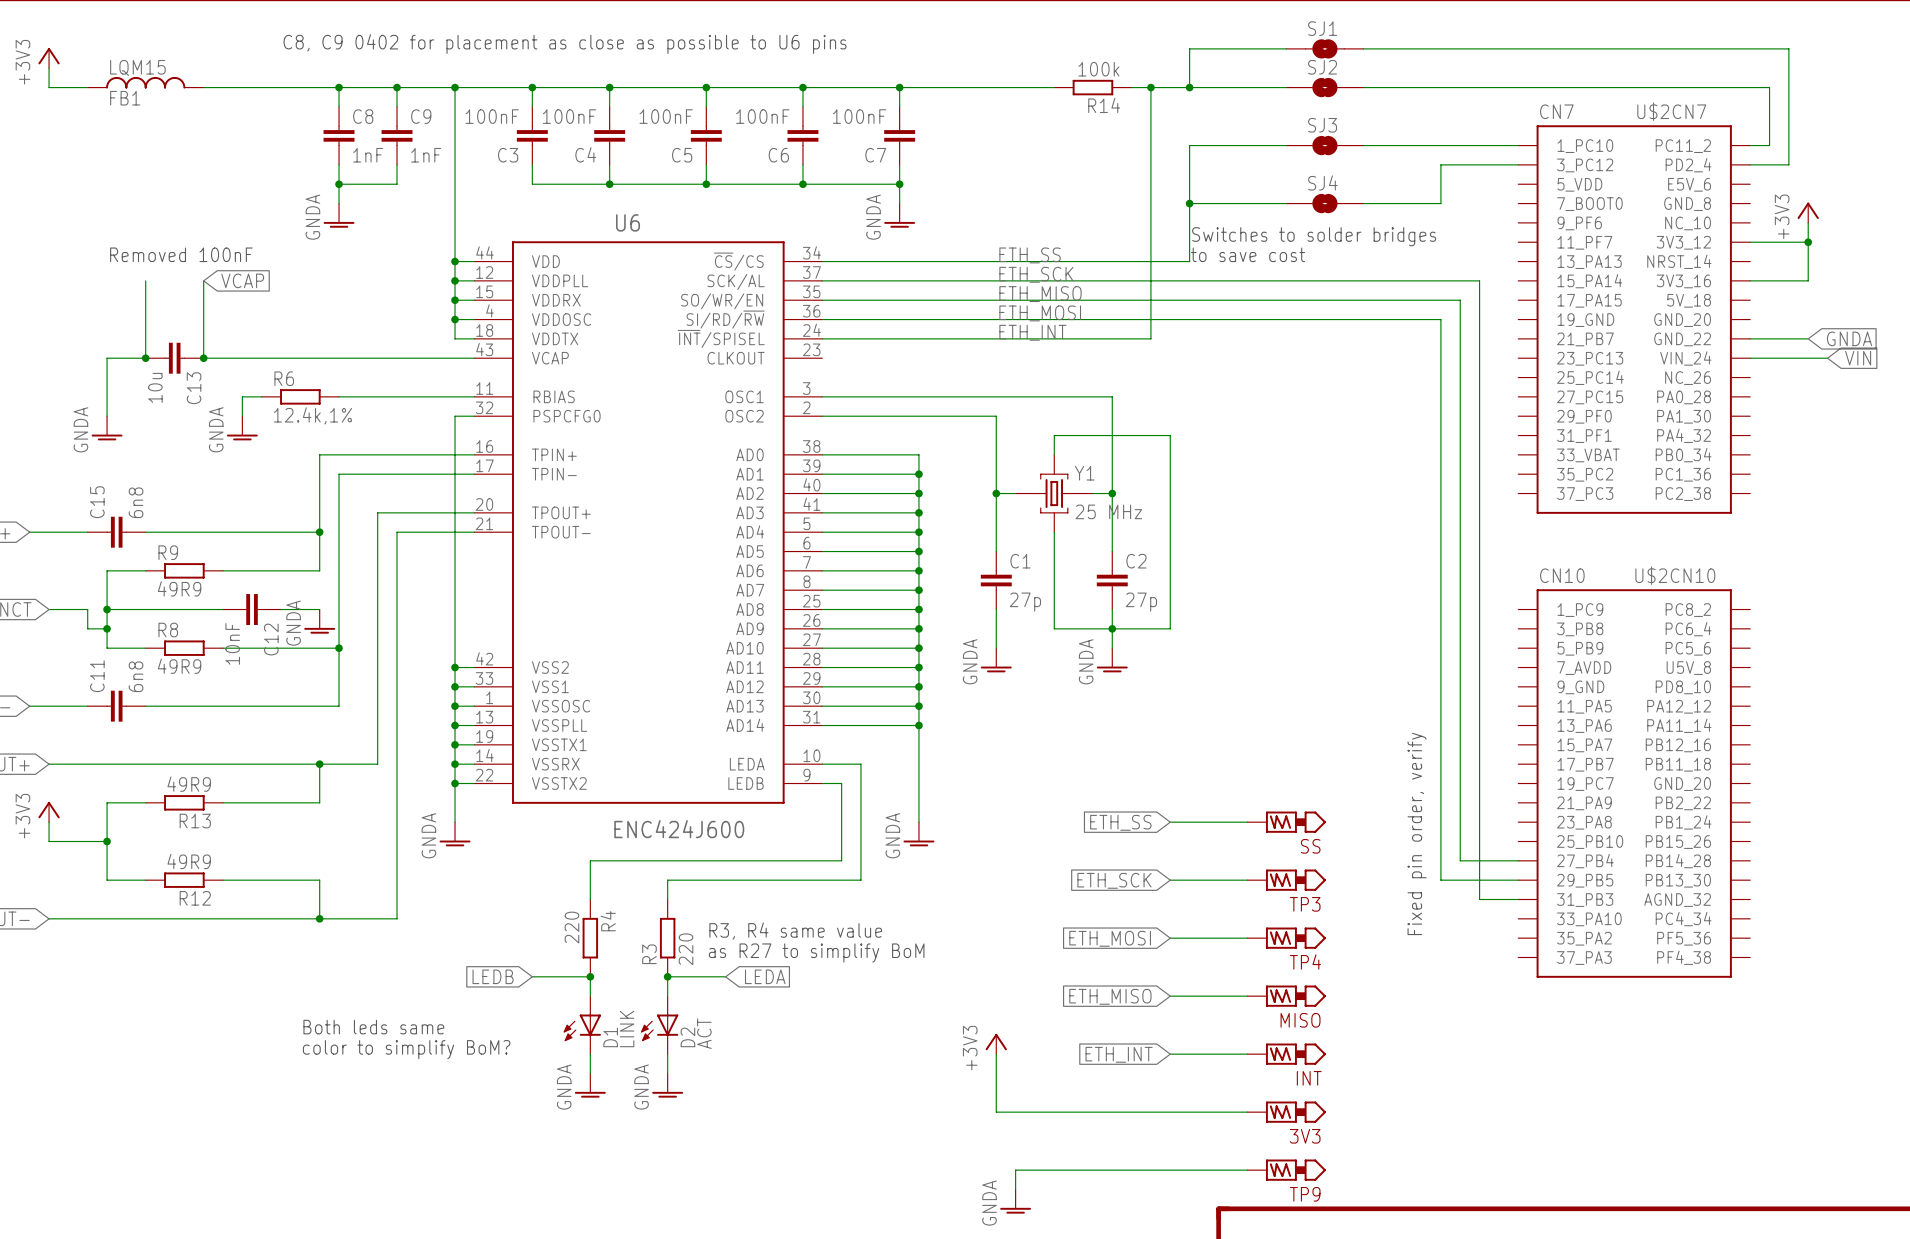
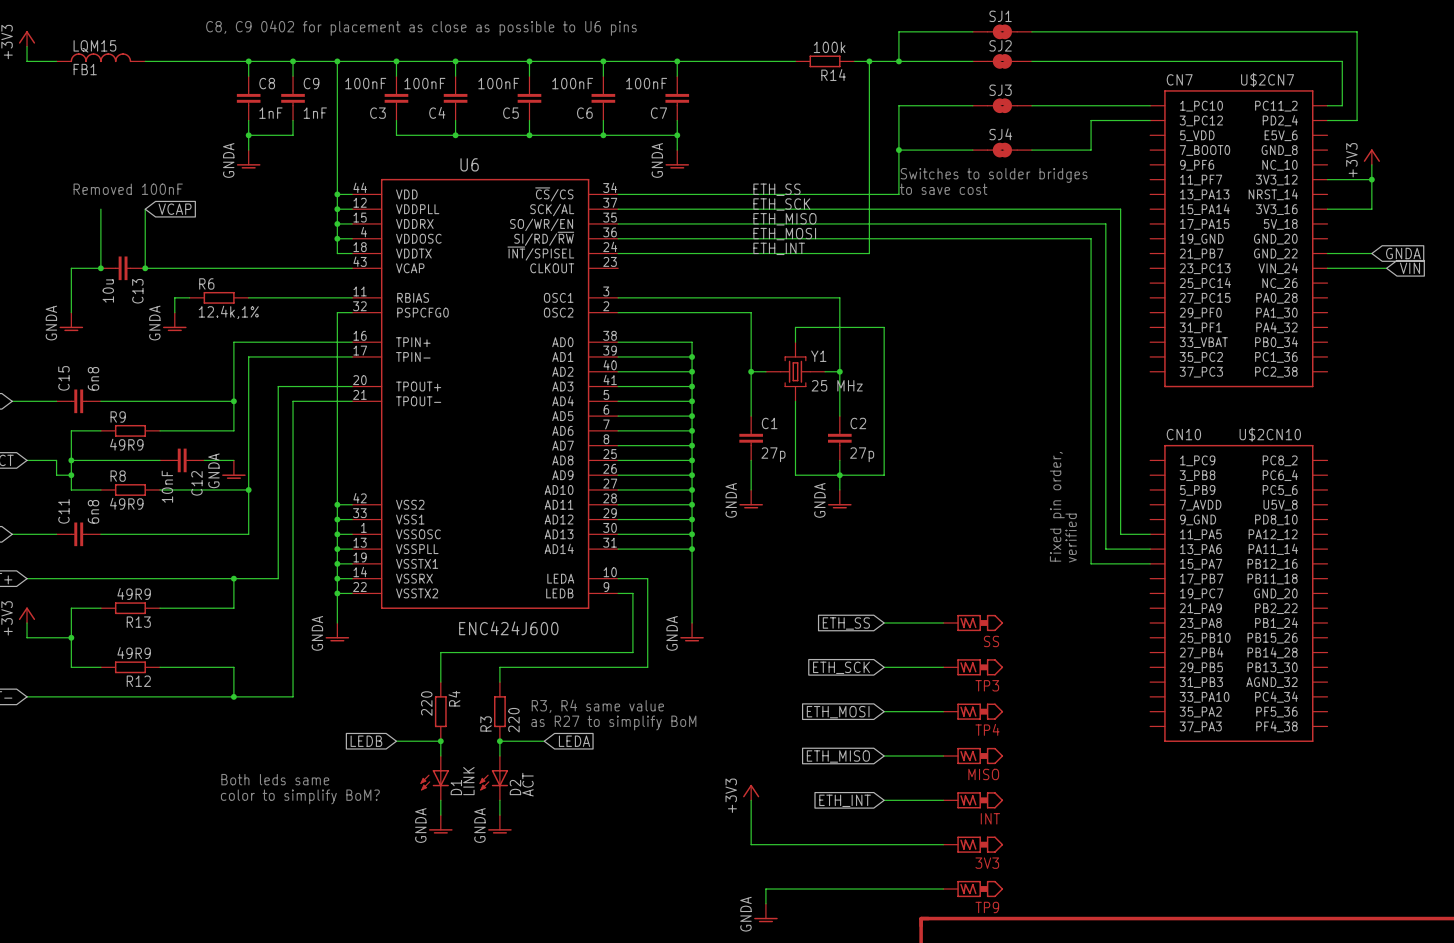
text: none -> Fixed pin order, (1057, 506)
wire: (1479, 706) (1479, 899) (1518, 899) -> (1120, 534) (1150, 534)
text: none -> verified (1071, 538)
wire: (1460, 725) (1460, 860) (1518, 860) -> (1105, 549) (1150, 549)
wire: (1440, 744) (1440, 880) (1518, 880) -> (1091, 563) (1150, 563)
text: Fixed pin order, verify (1417, 833) -> none

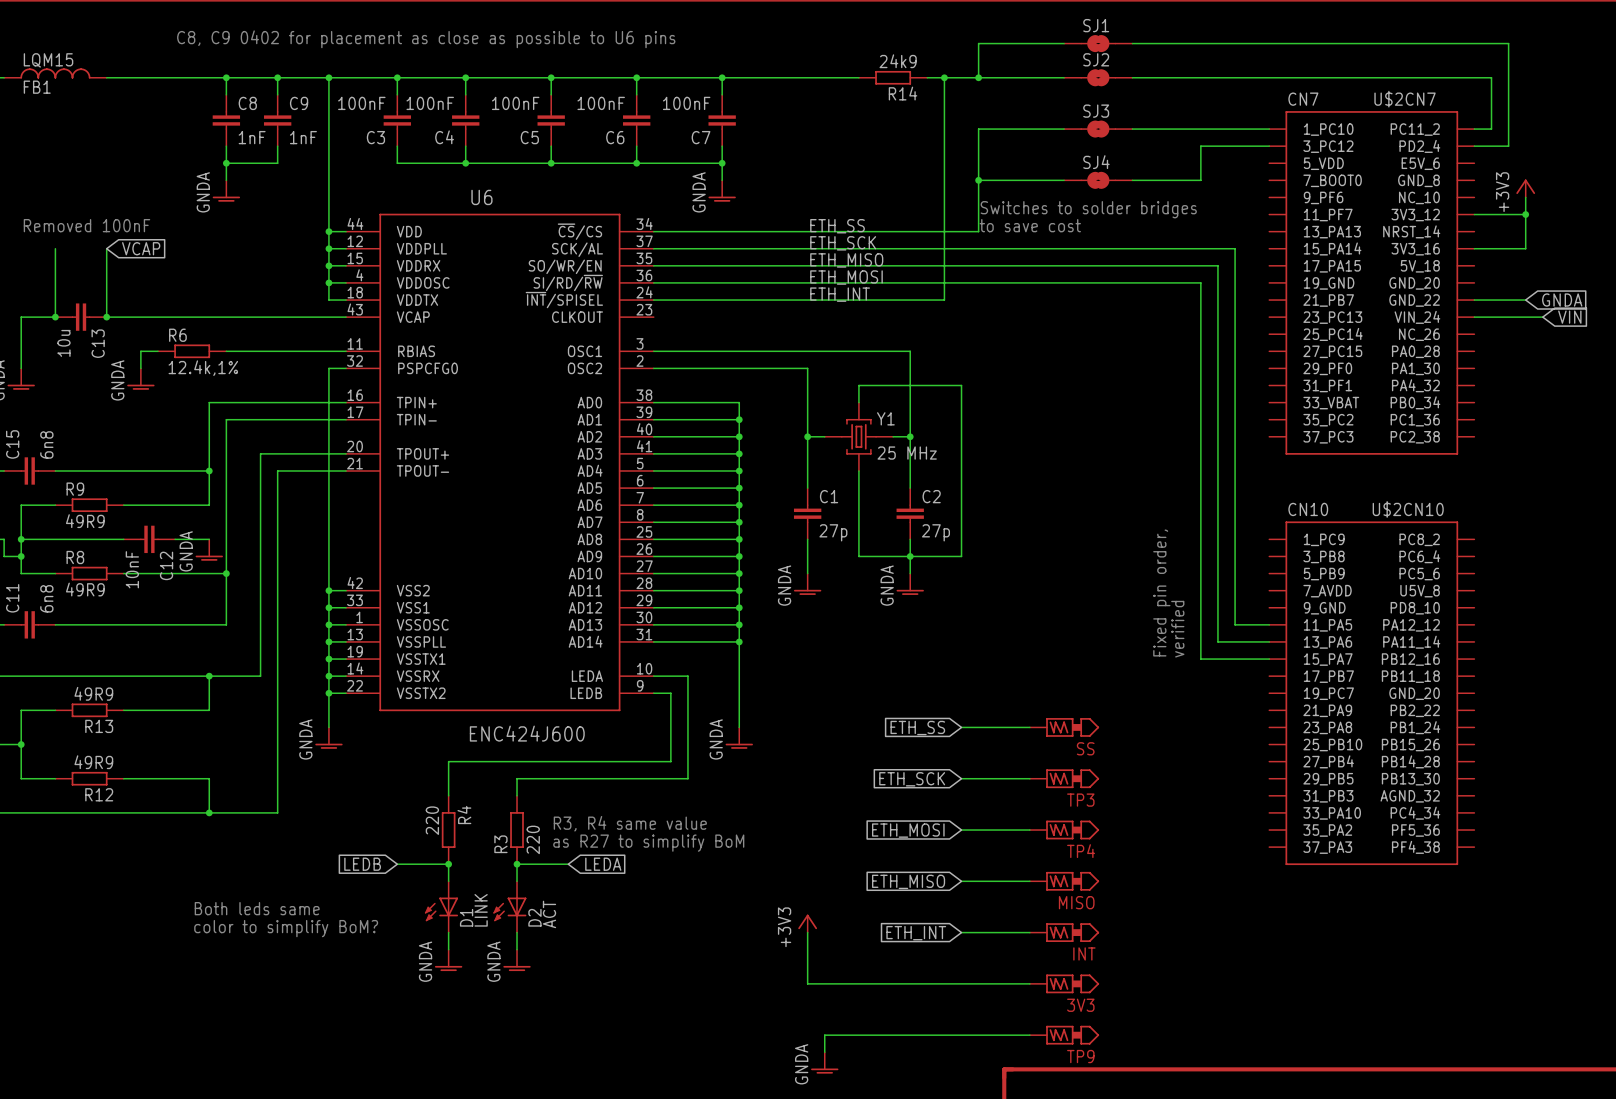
R14 value: 100k (829, 47) -> 24k9 (898, 61)

